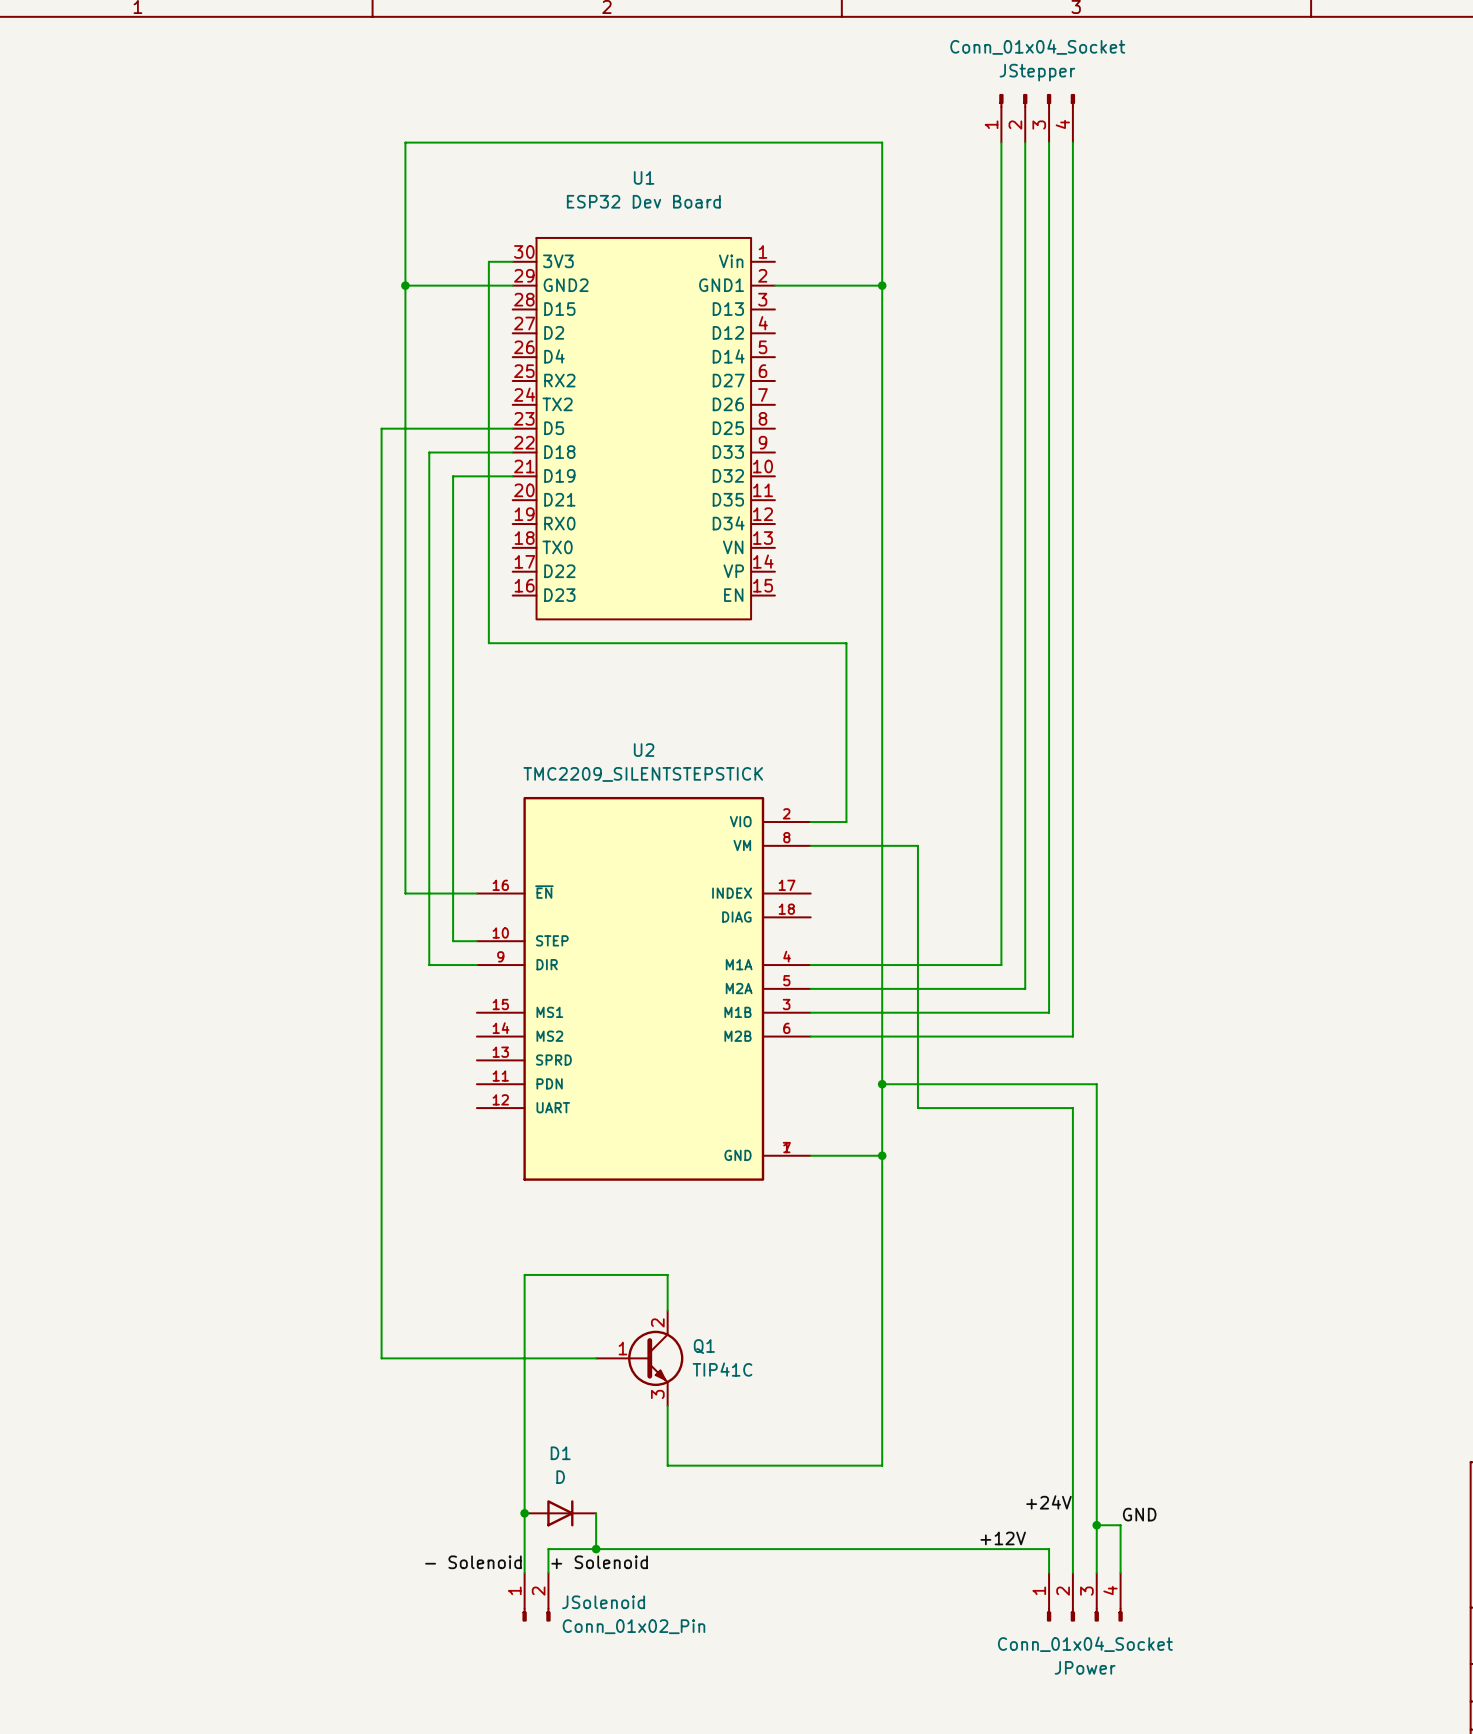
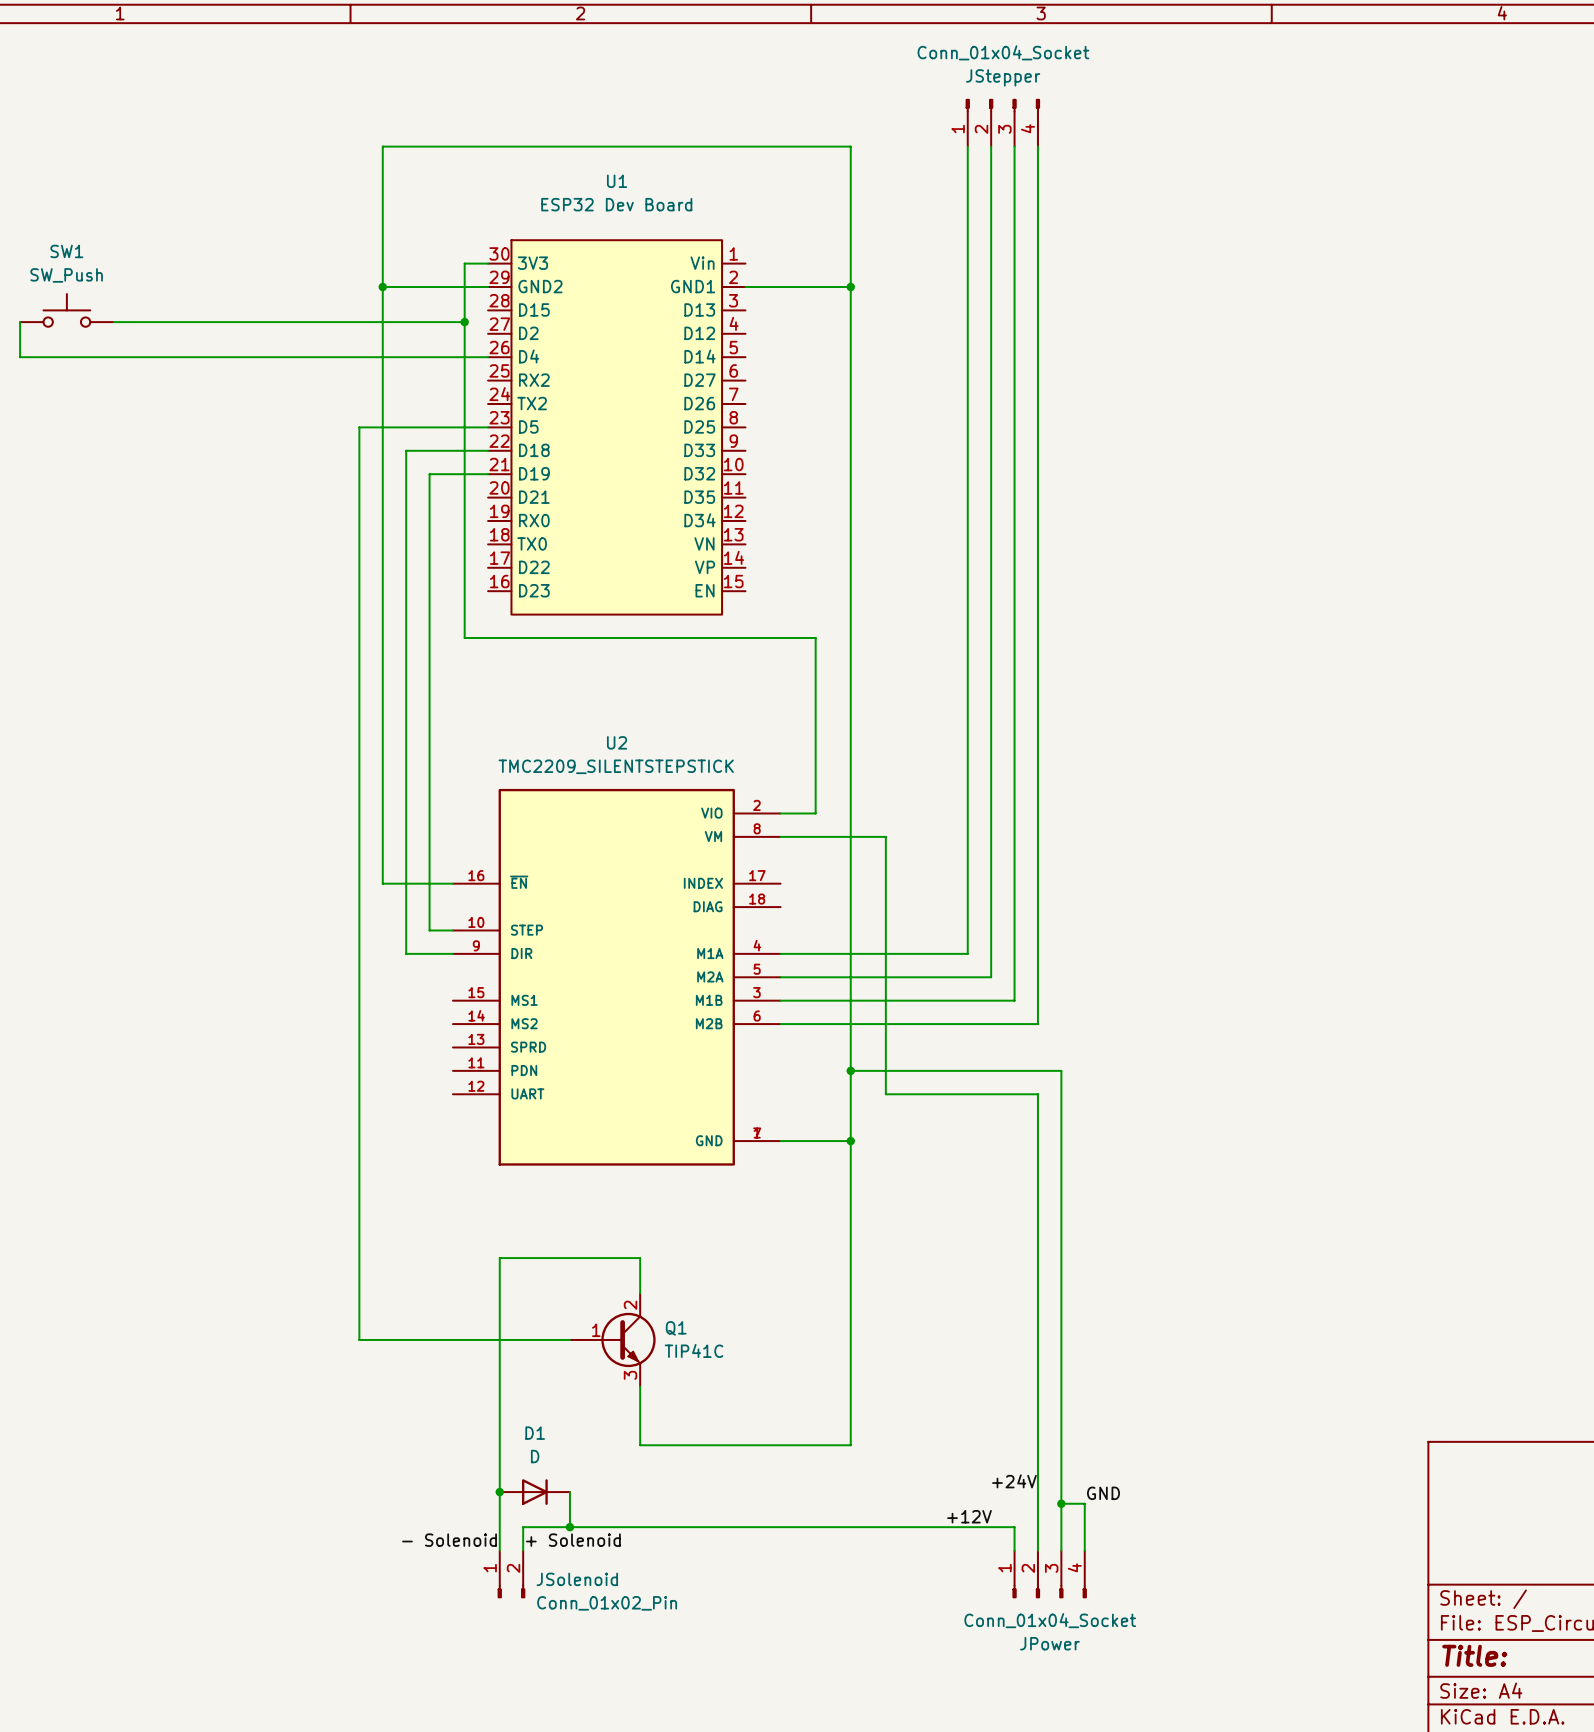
SW1: none -> SW_Push (66, 310)
wire: none -> (20, 322) (20, 357) (488, 357)
wire: none -> (113, 322) (464, 322)
junction: none -> (464, 322)

